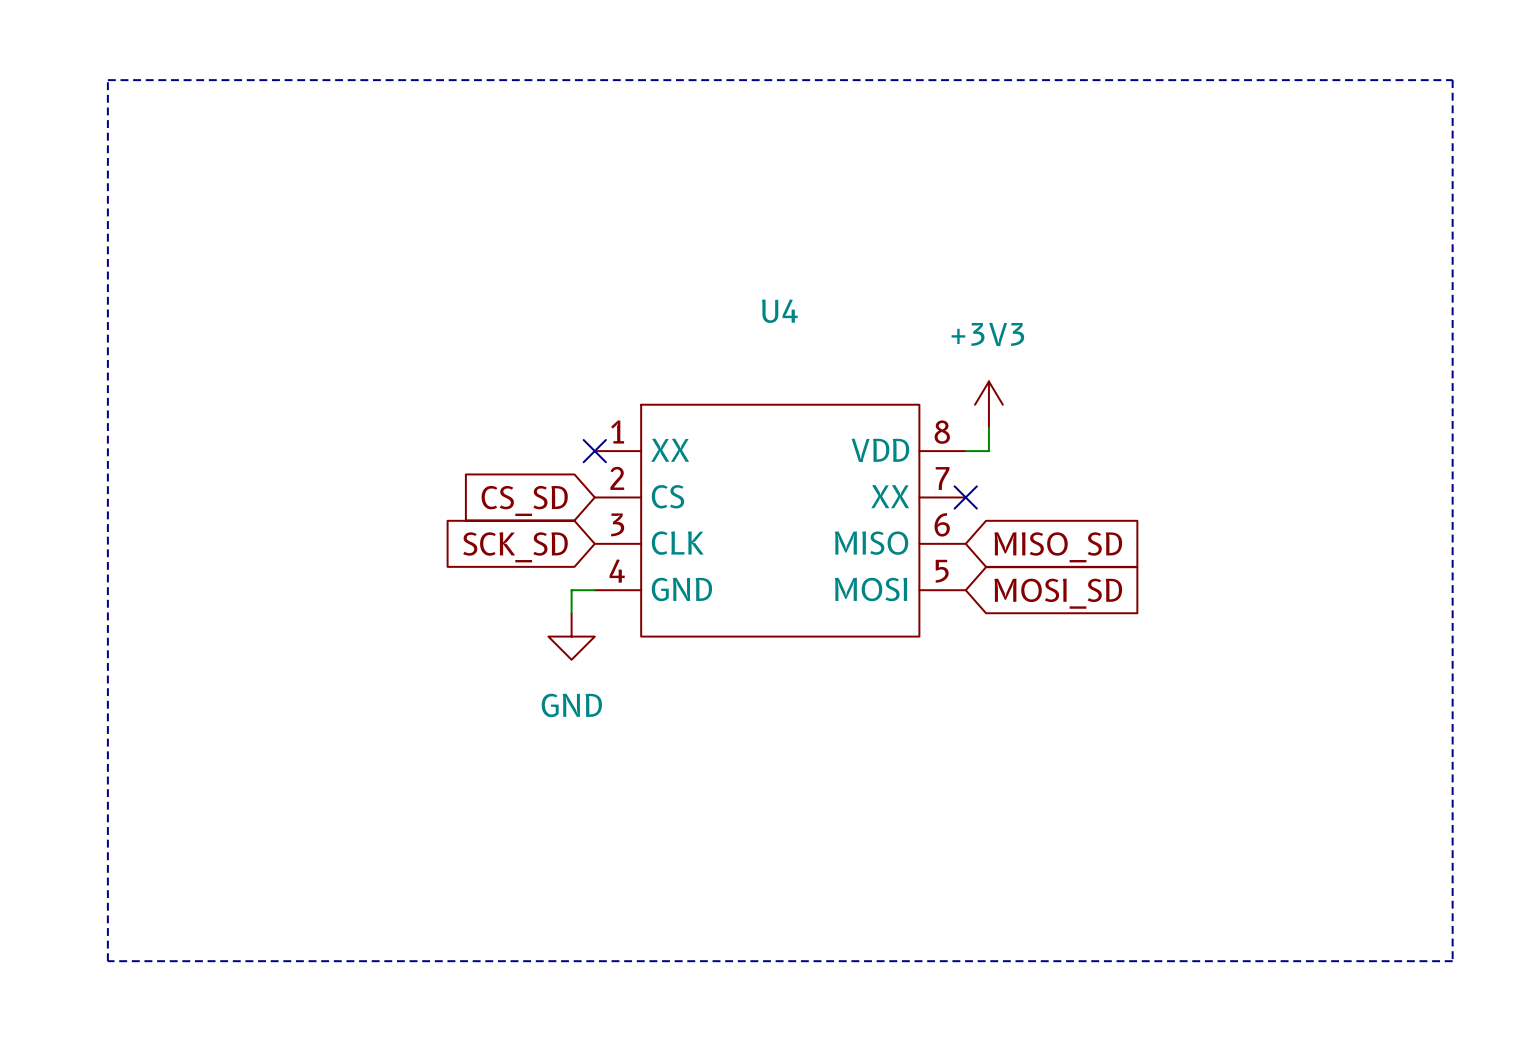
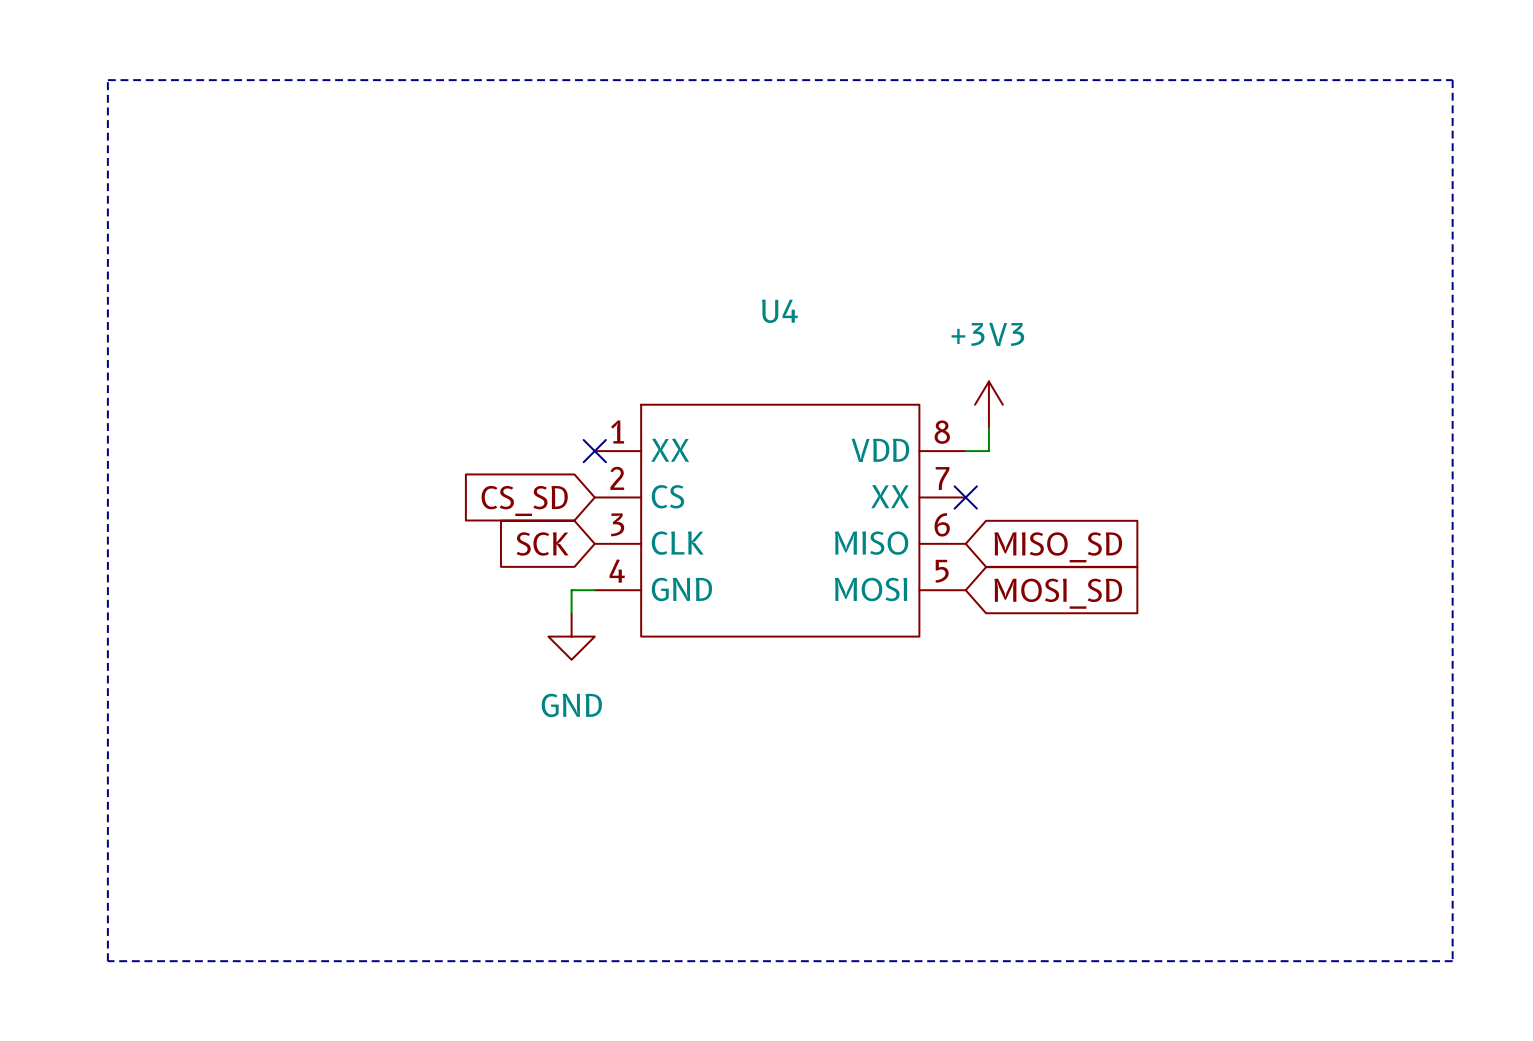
global label: SCK_SD (515, 547) -> SCK (542, 543)

